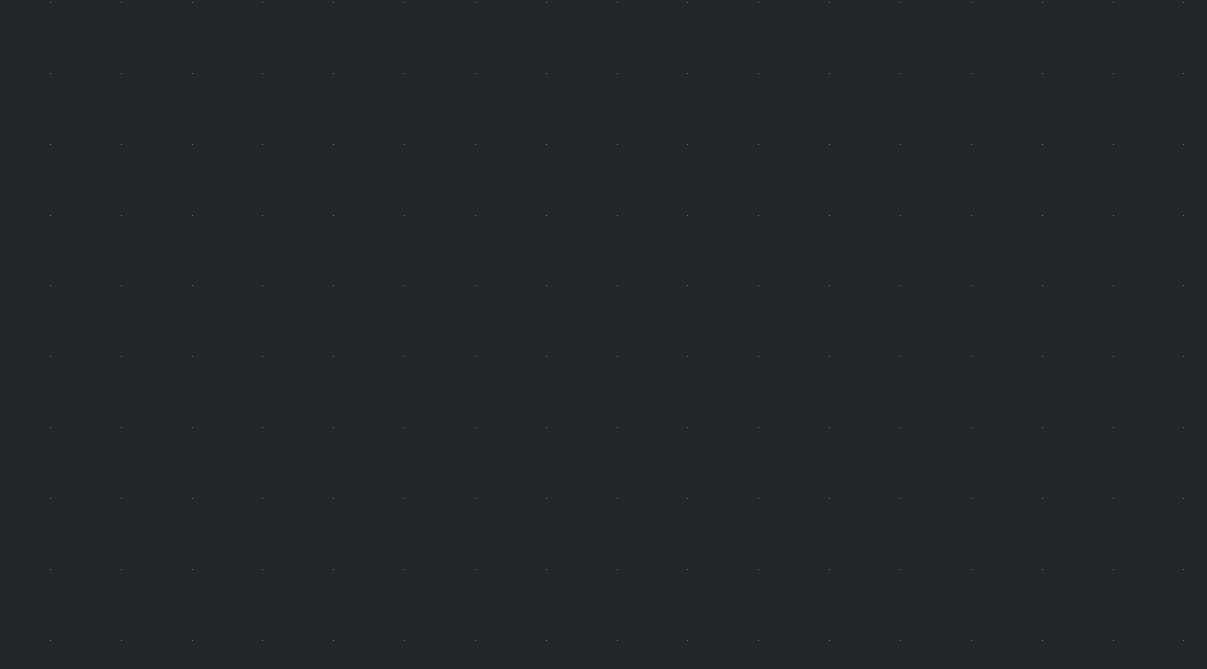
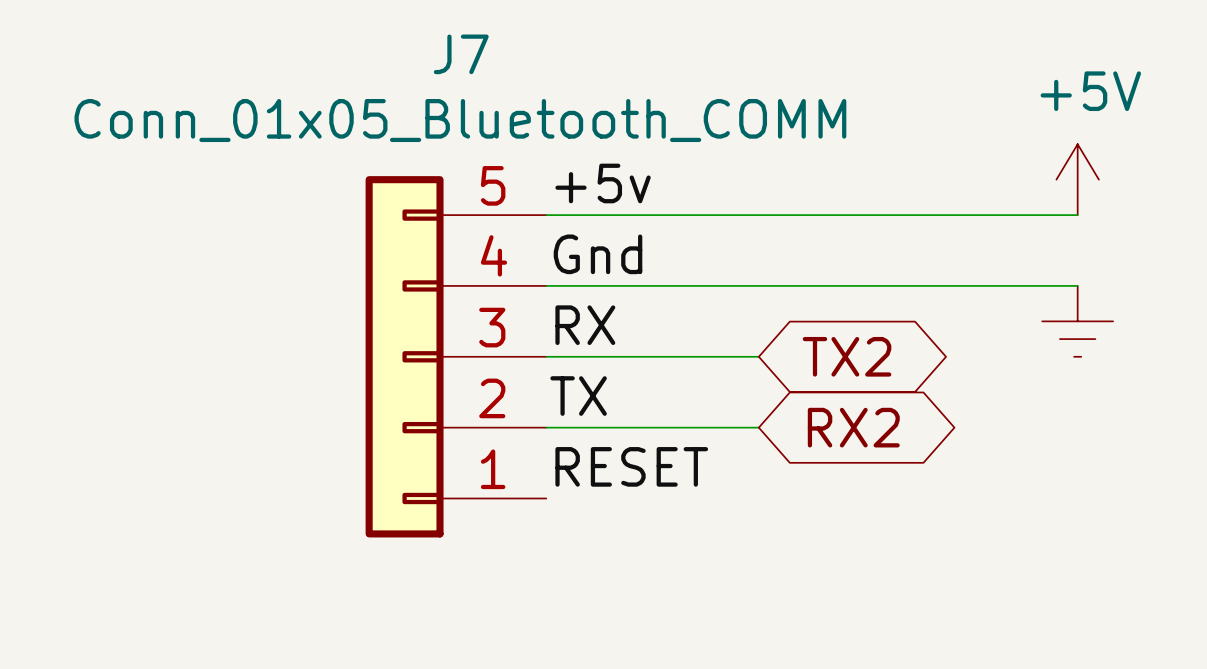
power symbol: none -> +5V (1077, 179)
label: none -> +5v (603, 183)
wire: none -> (546, 215) (1077, 215)
label: none -> Gnd (598, 254)
wire: none -> (546, 285) (1077, 285)
power symbol: none -> (1077, 321)
label: none -> RX (585, 325)
J7: none -> Conn_01x05_Bluetooth_COMM (455, 356)
wire: none -> (546, 356) (758, 356)
global label: none -> TX2 (847, 356)
label: none -> TX (578, 396)
wire: none -> (546, 427) (758, 427)
global label: none -> RX2 (853, 427)
label: none -> RESET (631, 466)

